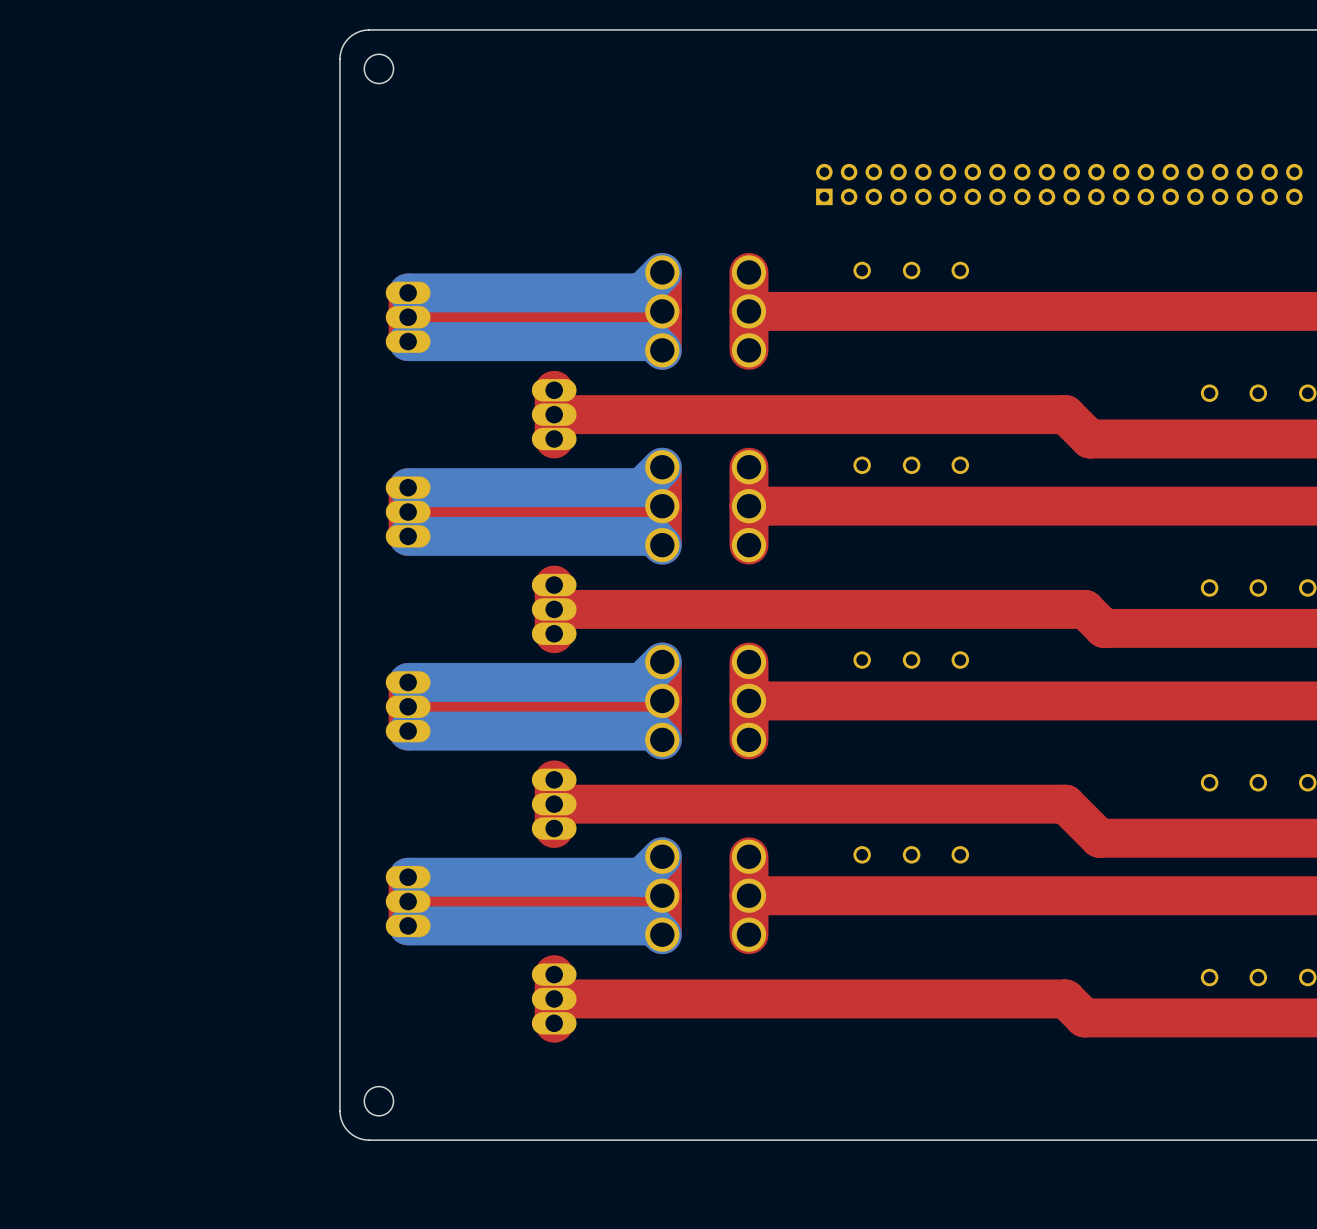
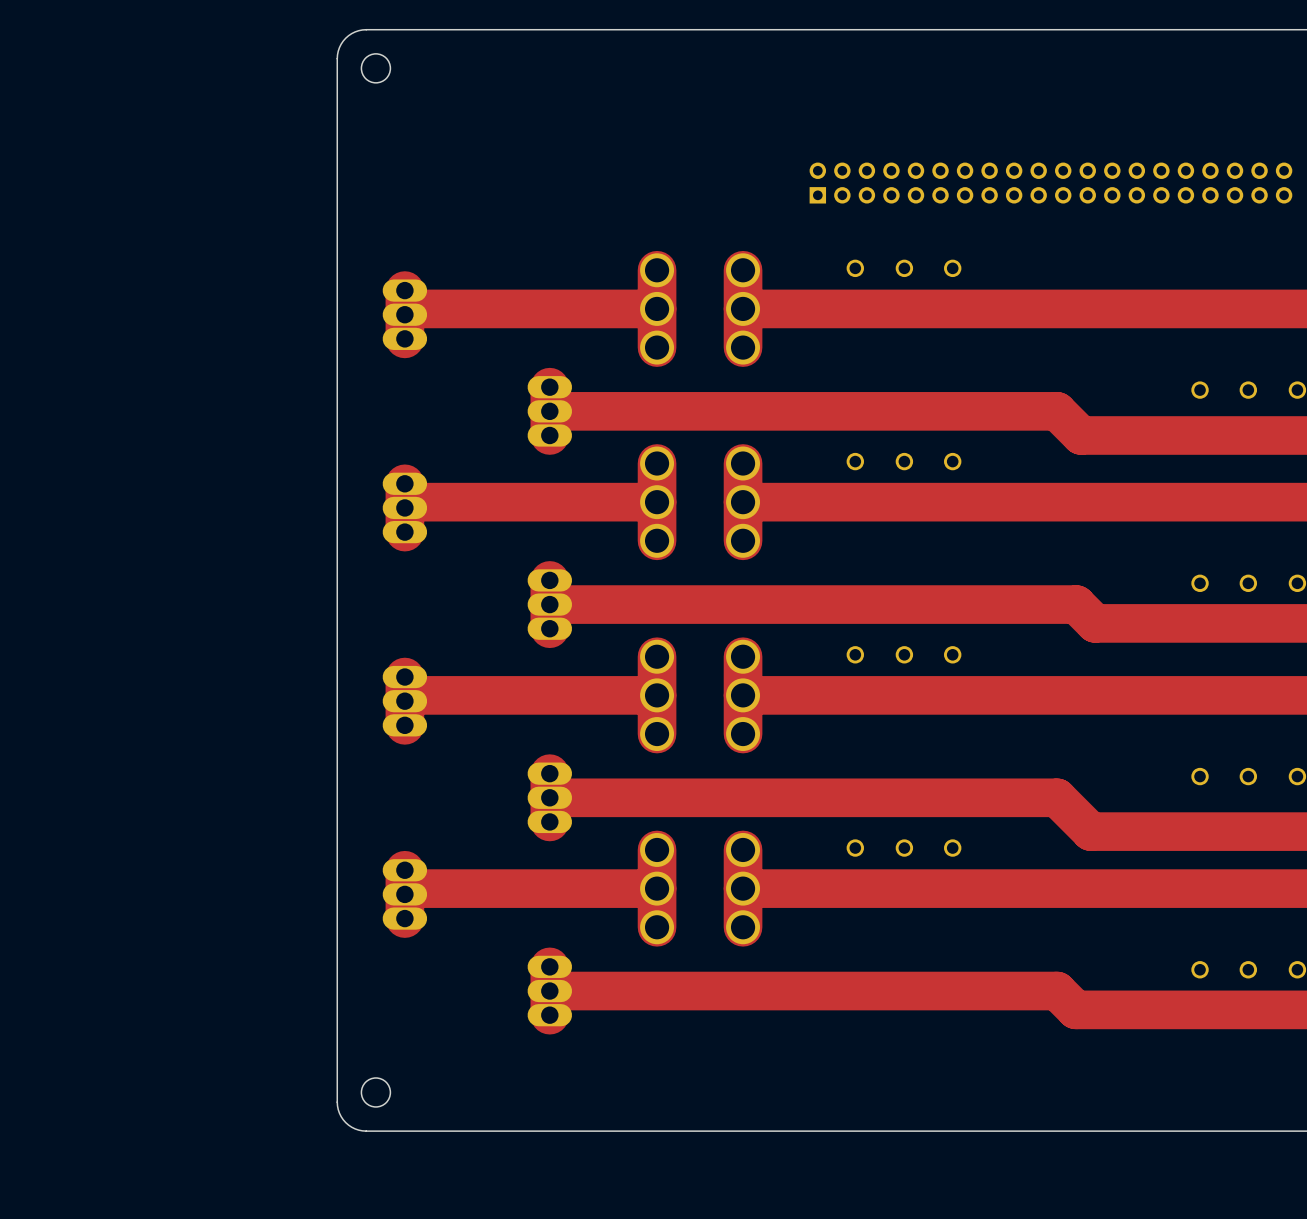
bottom track: (662, 272) (641, 292) (408, 292) -> none
bottom track: (408, 341) (653, 341) (662, 350) -> none
bottom track: (662, 467) (641, 487) (408, 487) -> none
bottom track: (408, 536) (653, 536) (662, 545) -> none
bottom track: (662, 661) (641, 682) (408, 682) -> none
bottom track: (408, 731) (653, 731) (662, 739) -> none
bottom track: (662, 856) (641, 877) (408, 877) -> none
bottom track: (408, 925) (653, 925) (662, 934) -> none

